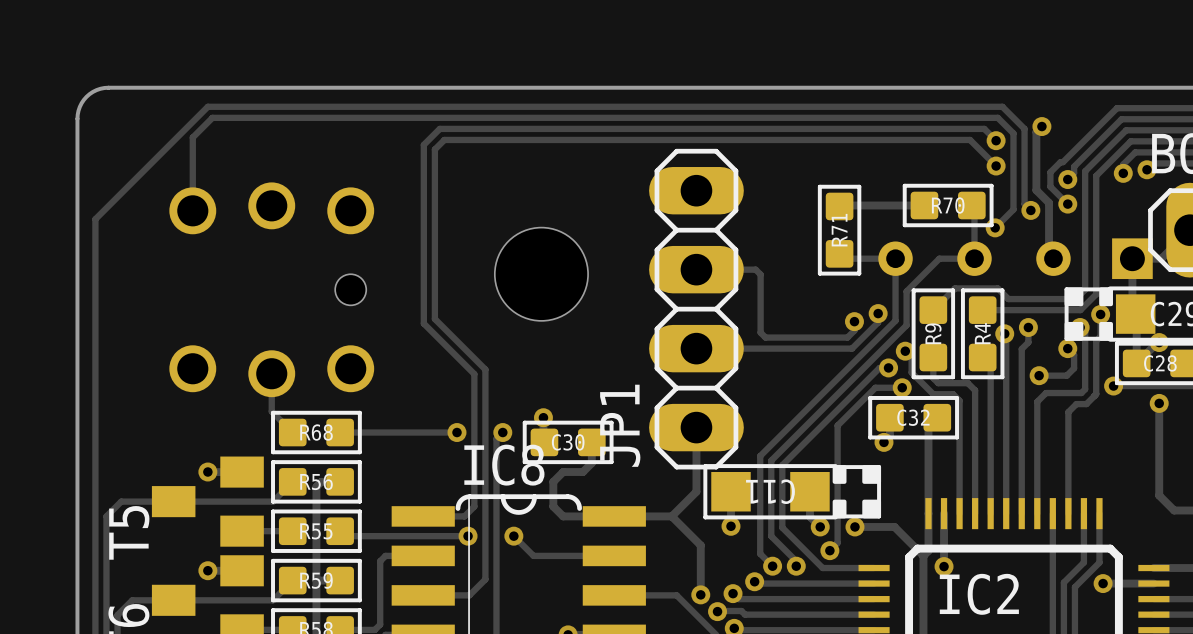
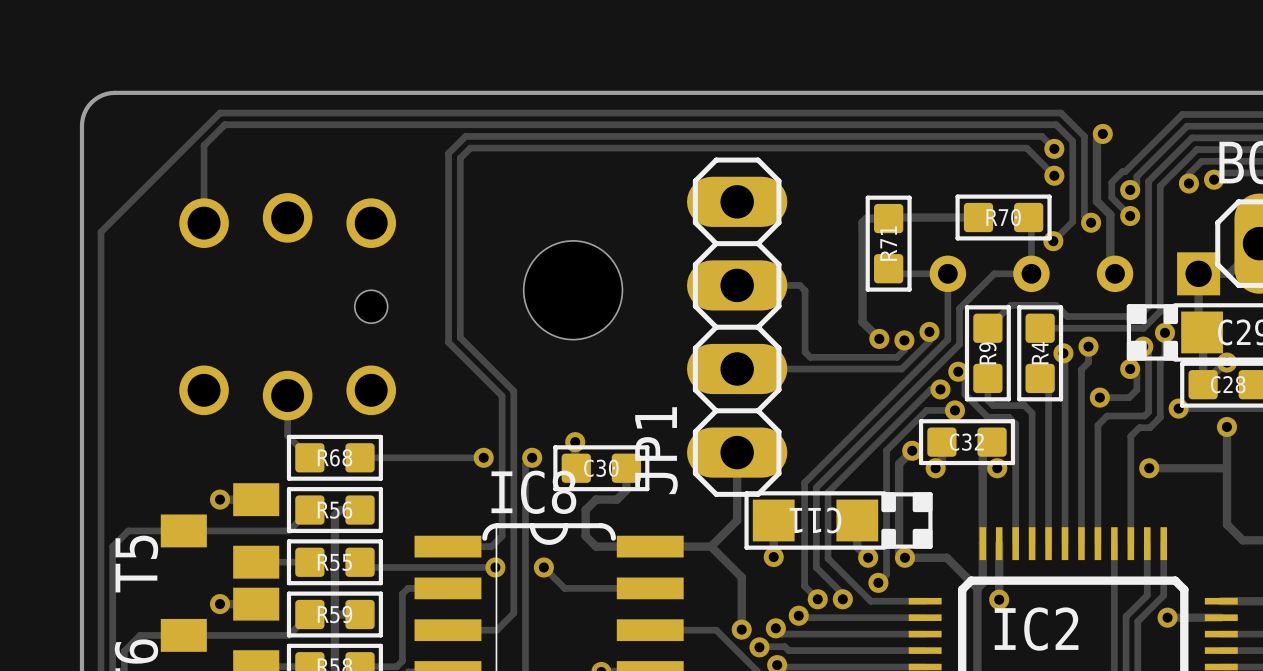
track: none -> (888, 218) (866, 218) (862, 222) (862, 322) (879, 338)
via: none -> (879, 338)
track: none -> (912, 450) (899, 463) (899, 551) (904, 557)
via: none -> (912, 450)
via: none -> (997, 468)
track: none -> (1149, 468) (1226, 468)
via: none -> (1149, 468)

